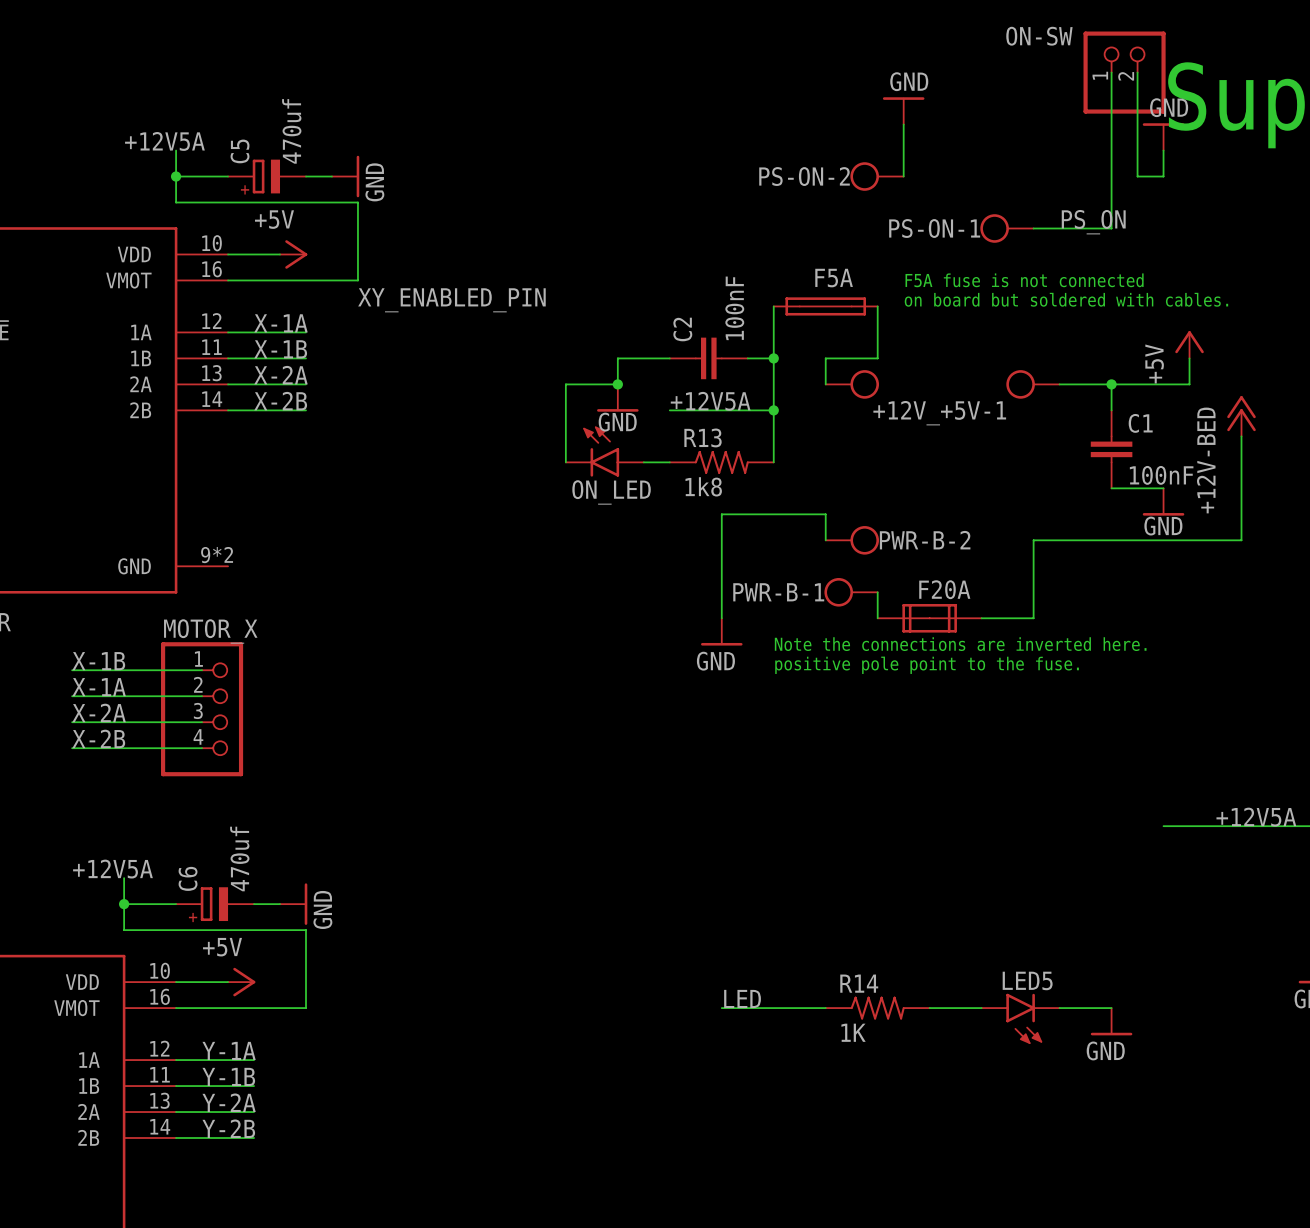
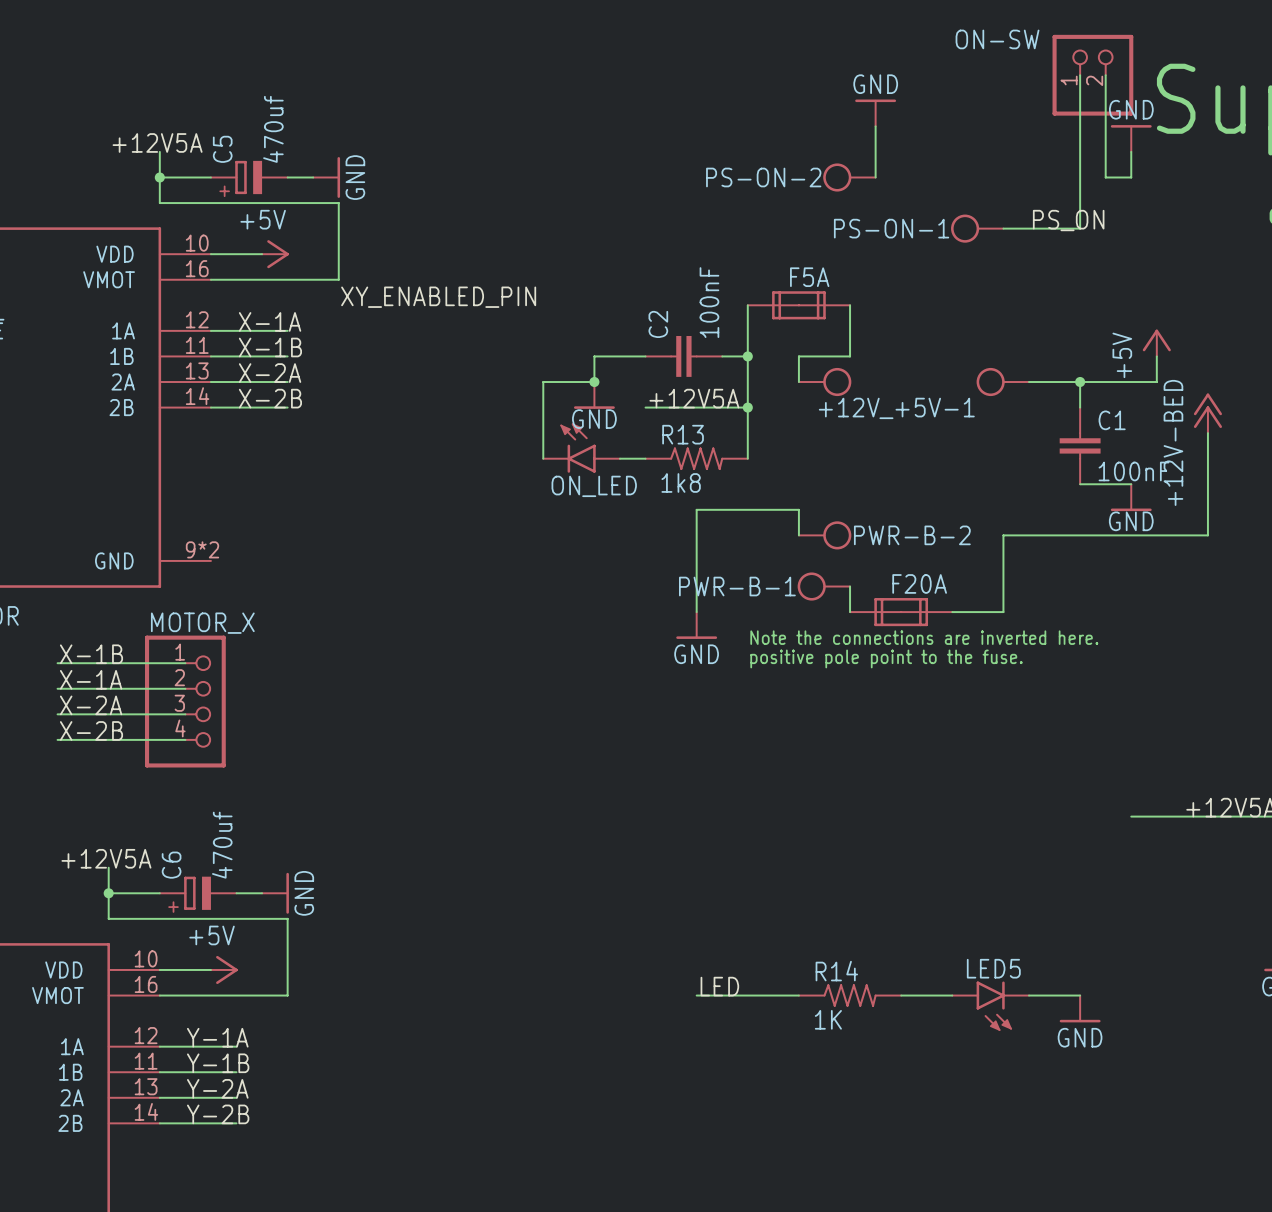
text: F5A fuse is not connected (1024, 280) -> none
F5A symbol: [773, 297, 878, 316] -> [747, 291, 851, 320]
text: on board but soldered with cables. (1066, 299) -> none

